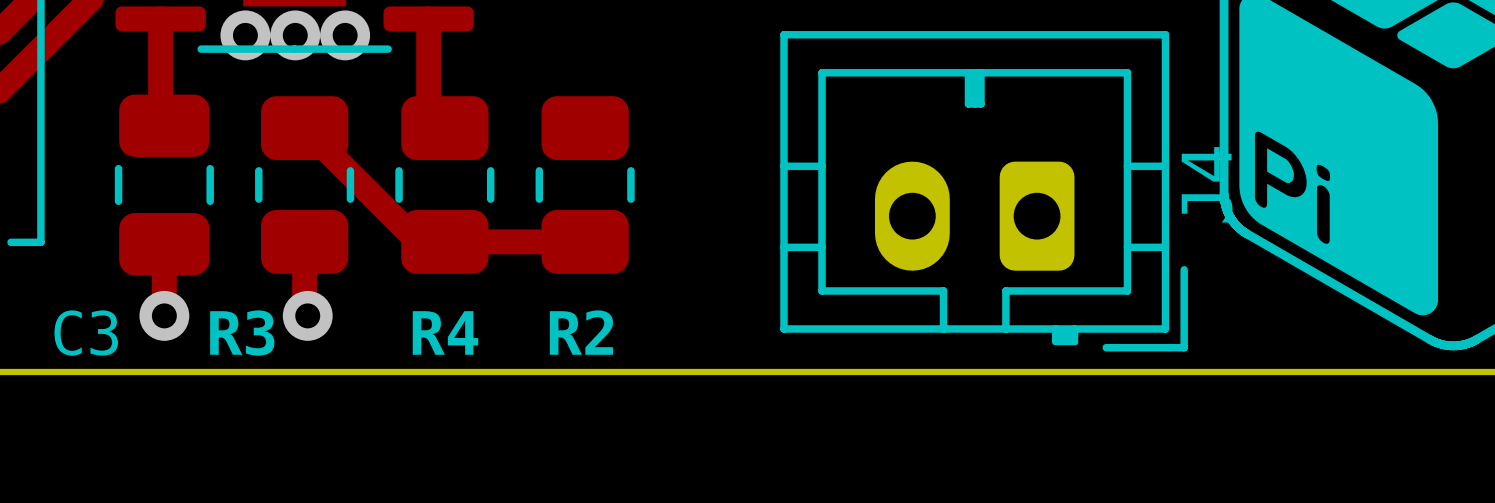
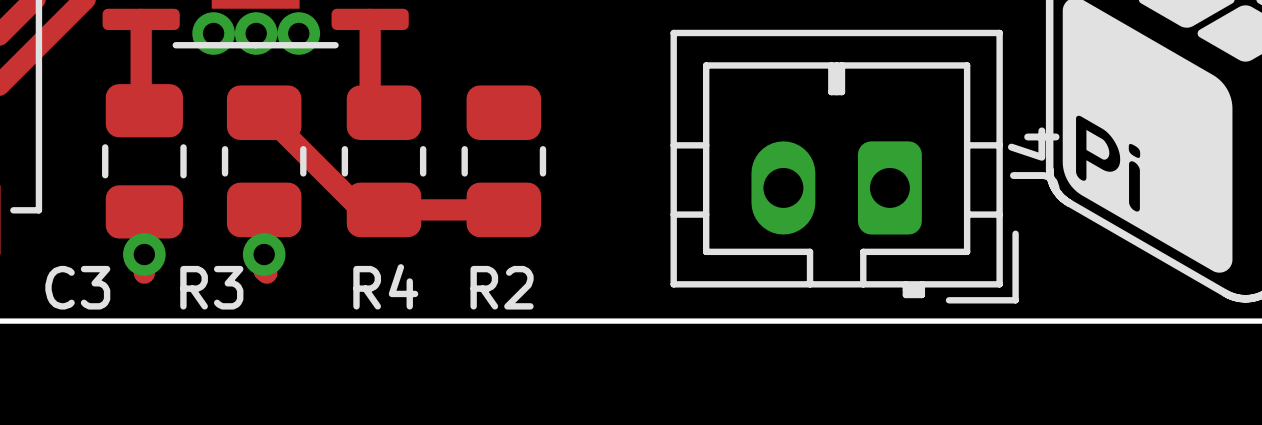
via position: (164, 315) -> (144, 254)
via position: (307, 315) -> (264, 254)

